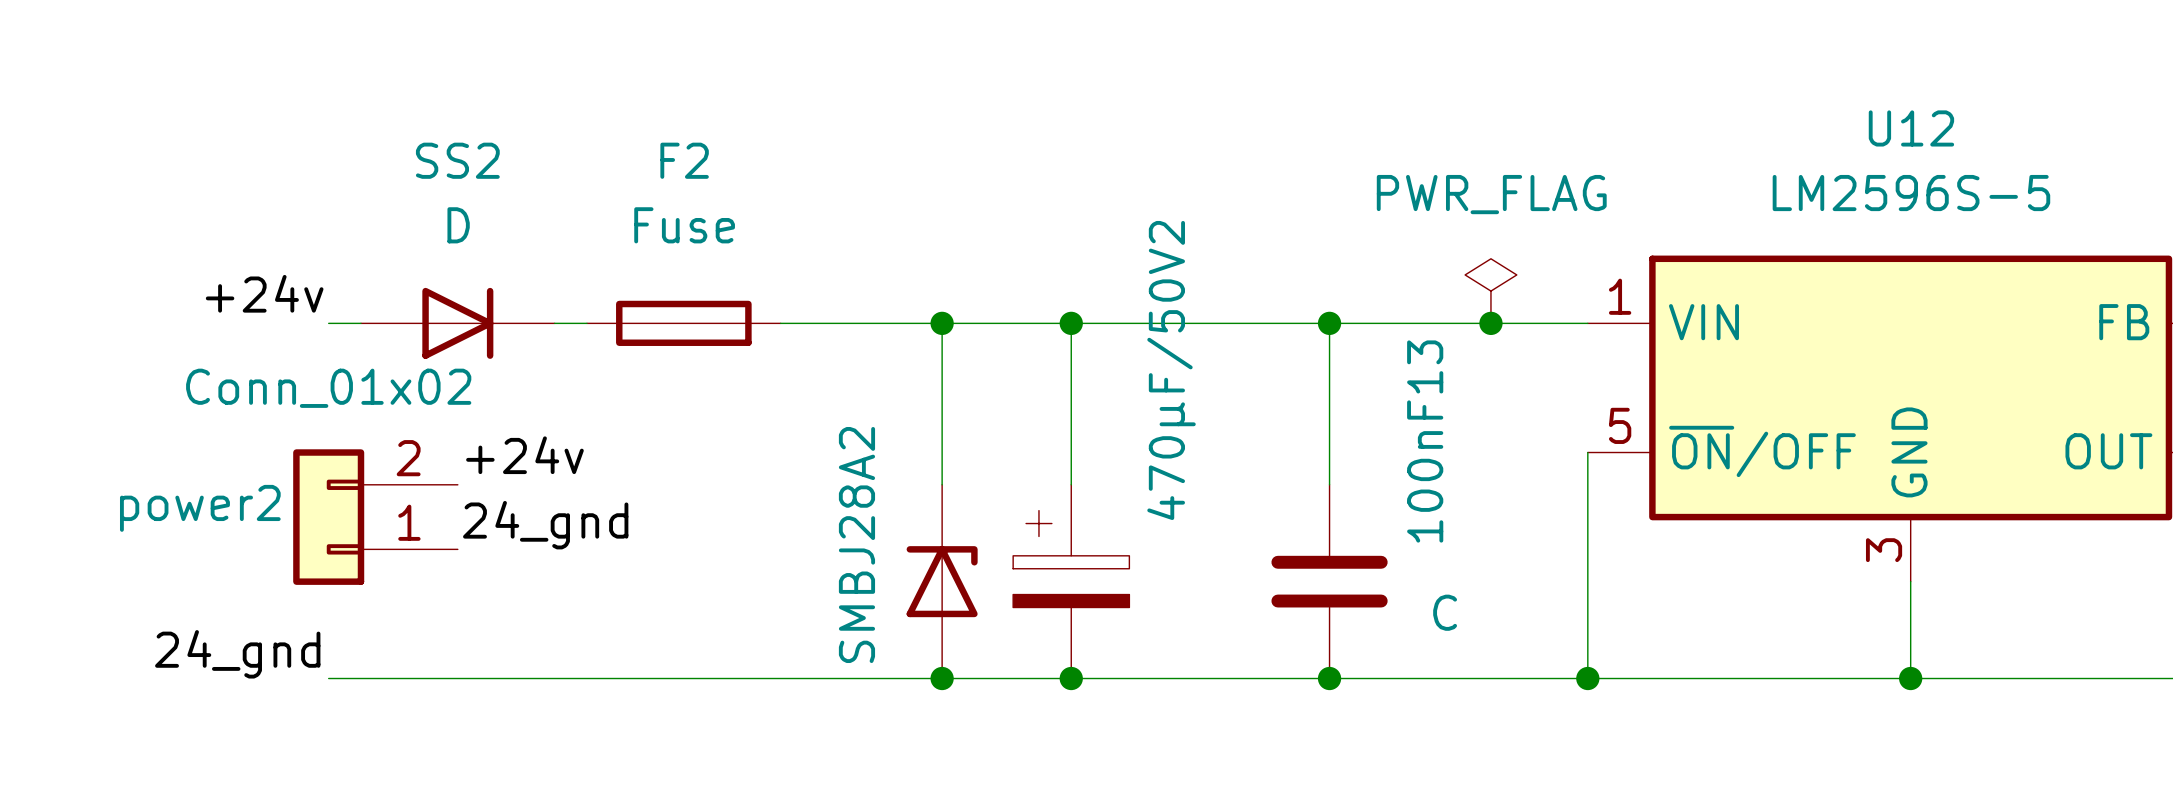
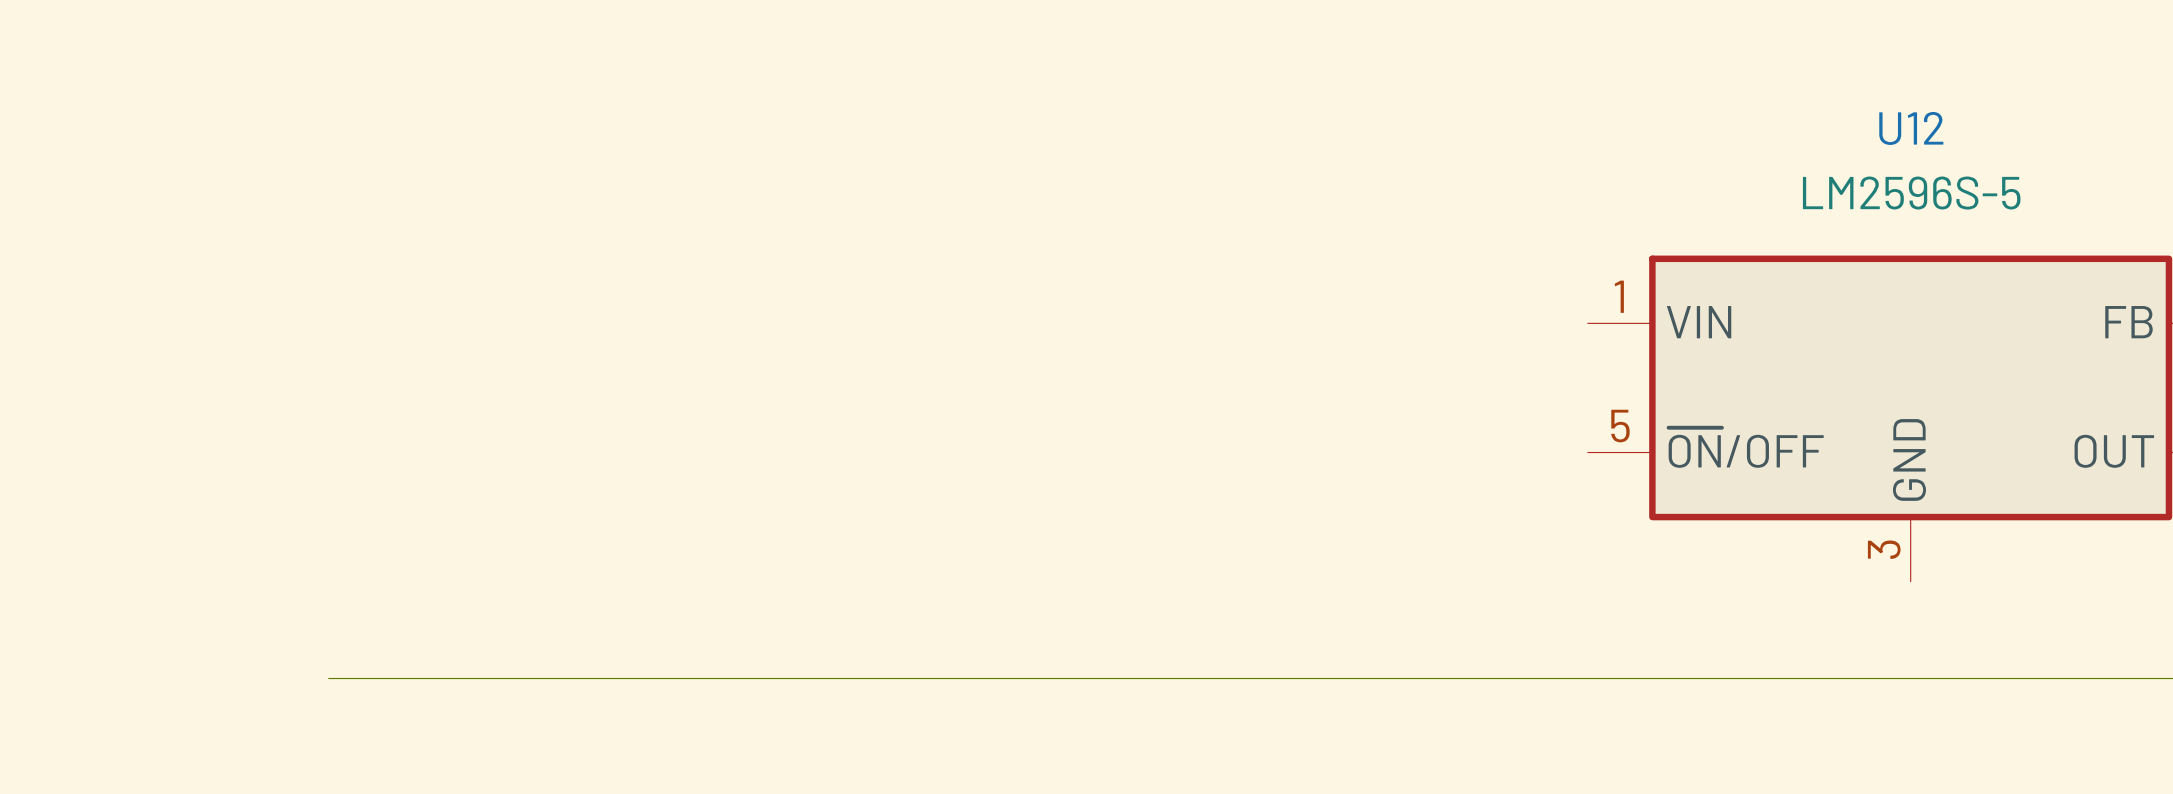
power symbol: PWR_FLAG (1490, 291) -> none
label: +24v (264, 293) -> none
wire: (328, 323) (360, 323) -> none
SS2: D (457, 323) -> none
wire: (554, 323) (586, 323) -> none
F2: Fuse (683, 323) -> none
wire: (780, 323) (1587, 323) -> none
wire: (942, 323) (942, 484) -> none
junction: (942, 323) -> none
wire: (1071, 323) (1071, 484) -> none
junction: (1071, 323) -> none
wire: (1329, 323) (1329, 484) -> none
junction: (1329, 323) -> none
junction: (1490, 323) -> none
wire: (1587, 452) (1587, 678) -> none
label: +24v (524, 455) -> none
power2: Conn_01x02 (375, 517) -> none
label: 24_gnd (545, 525) -> none
SMBJ28A2: (942, 581) -> none
470µF/50V2: (1071, 581) -> none
100nF13: C (1329, 581) -> none
wire: (1910, 581) (1910, 678) -> none
label: 24_gnd (237, 654) -> none
junction: (942, 678) -> none
junction: (1071, 678) -> none
junction: (1329, 678) -> none
junction: (1587, 678) -> none
junction: (1910, 678) -> none

